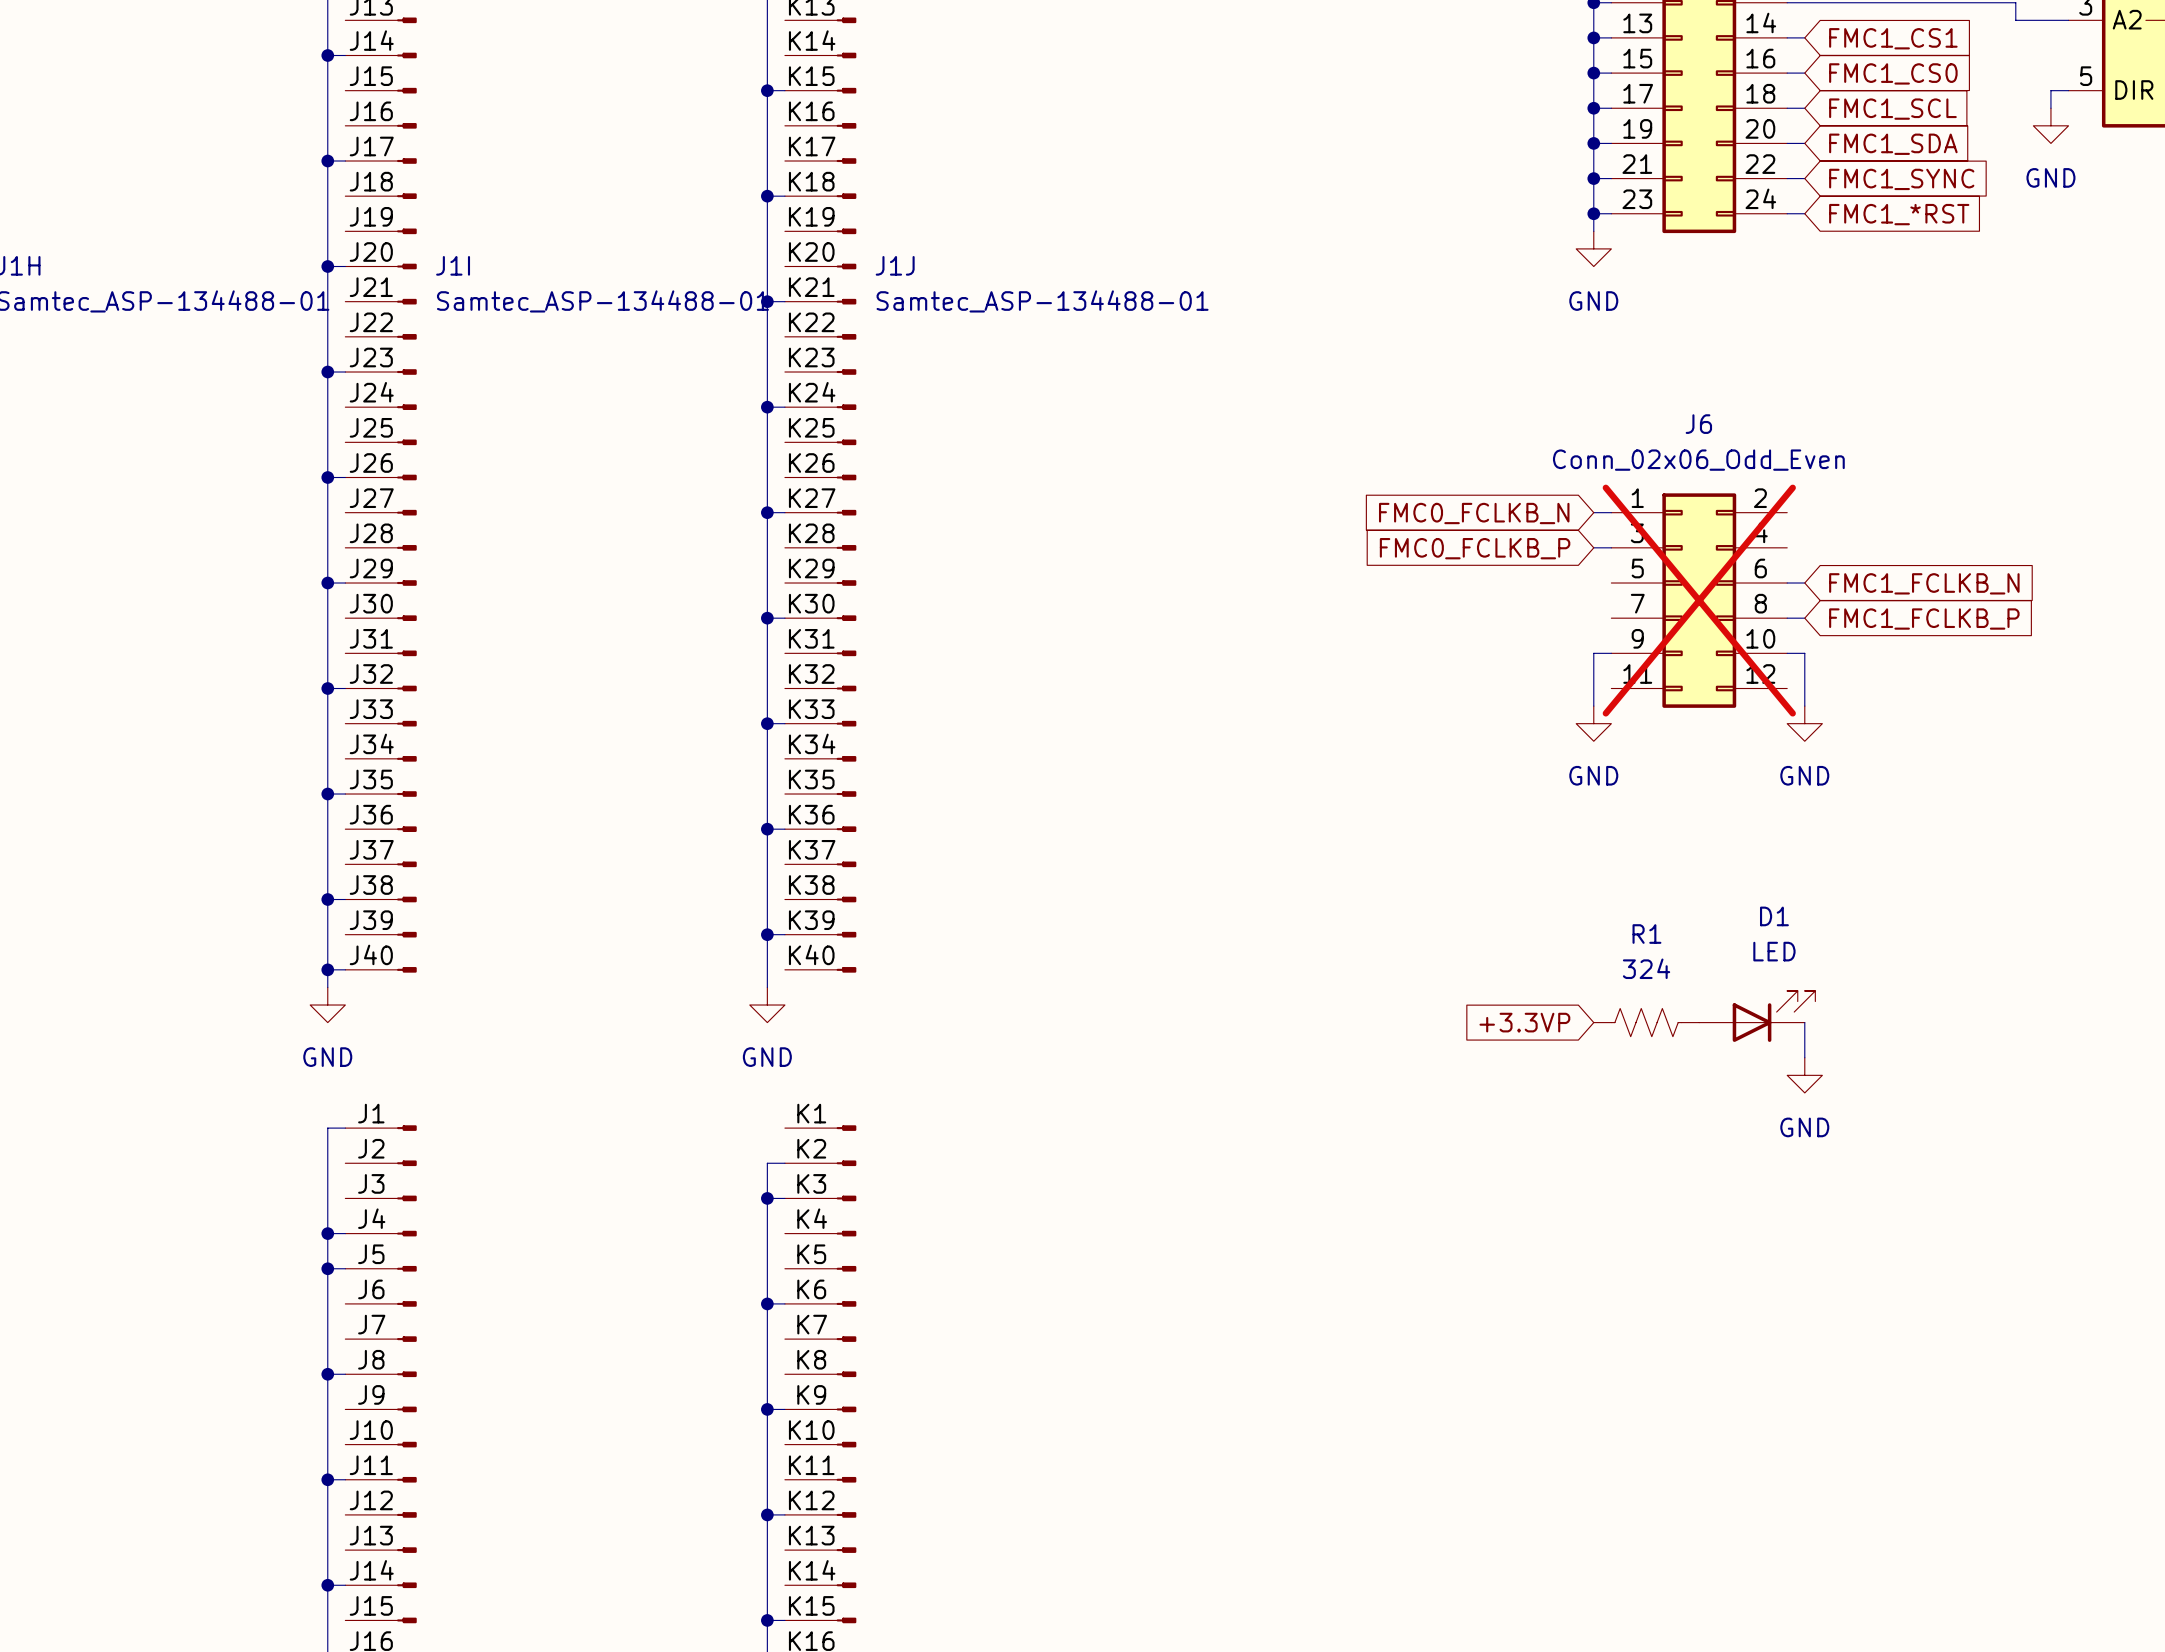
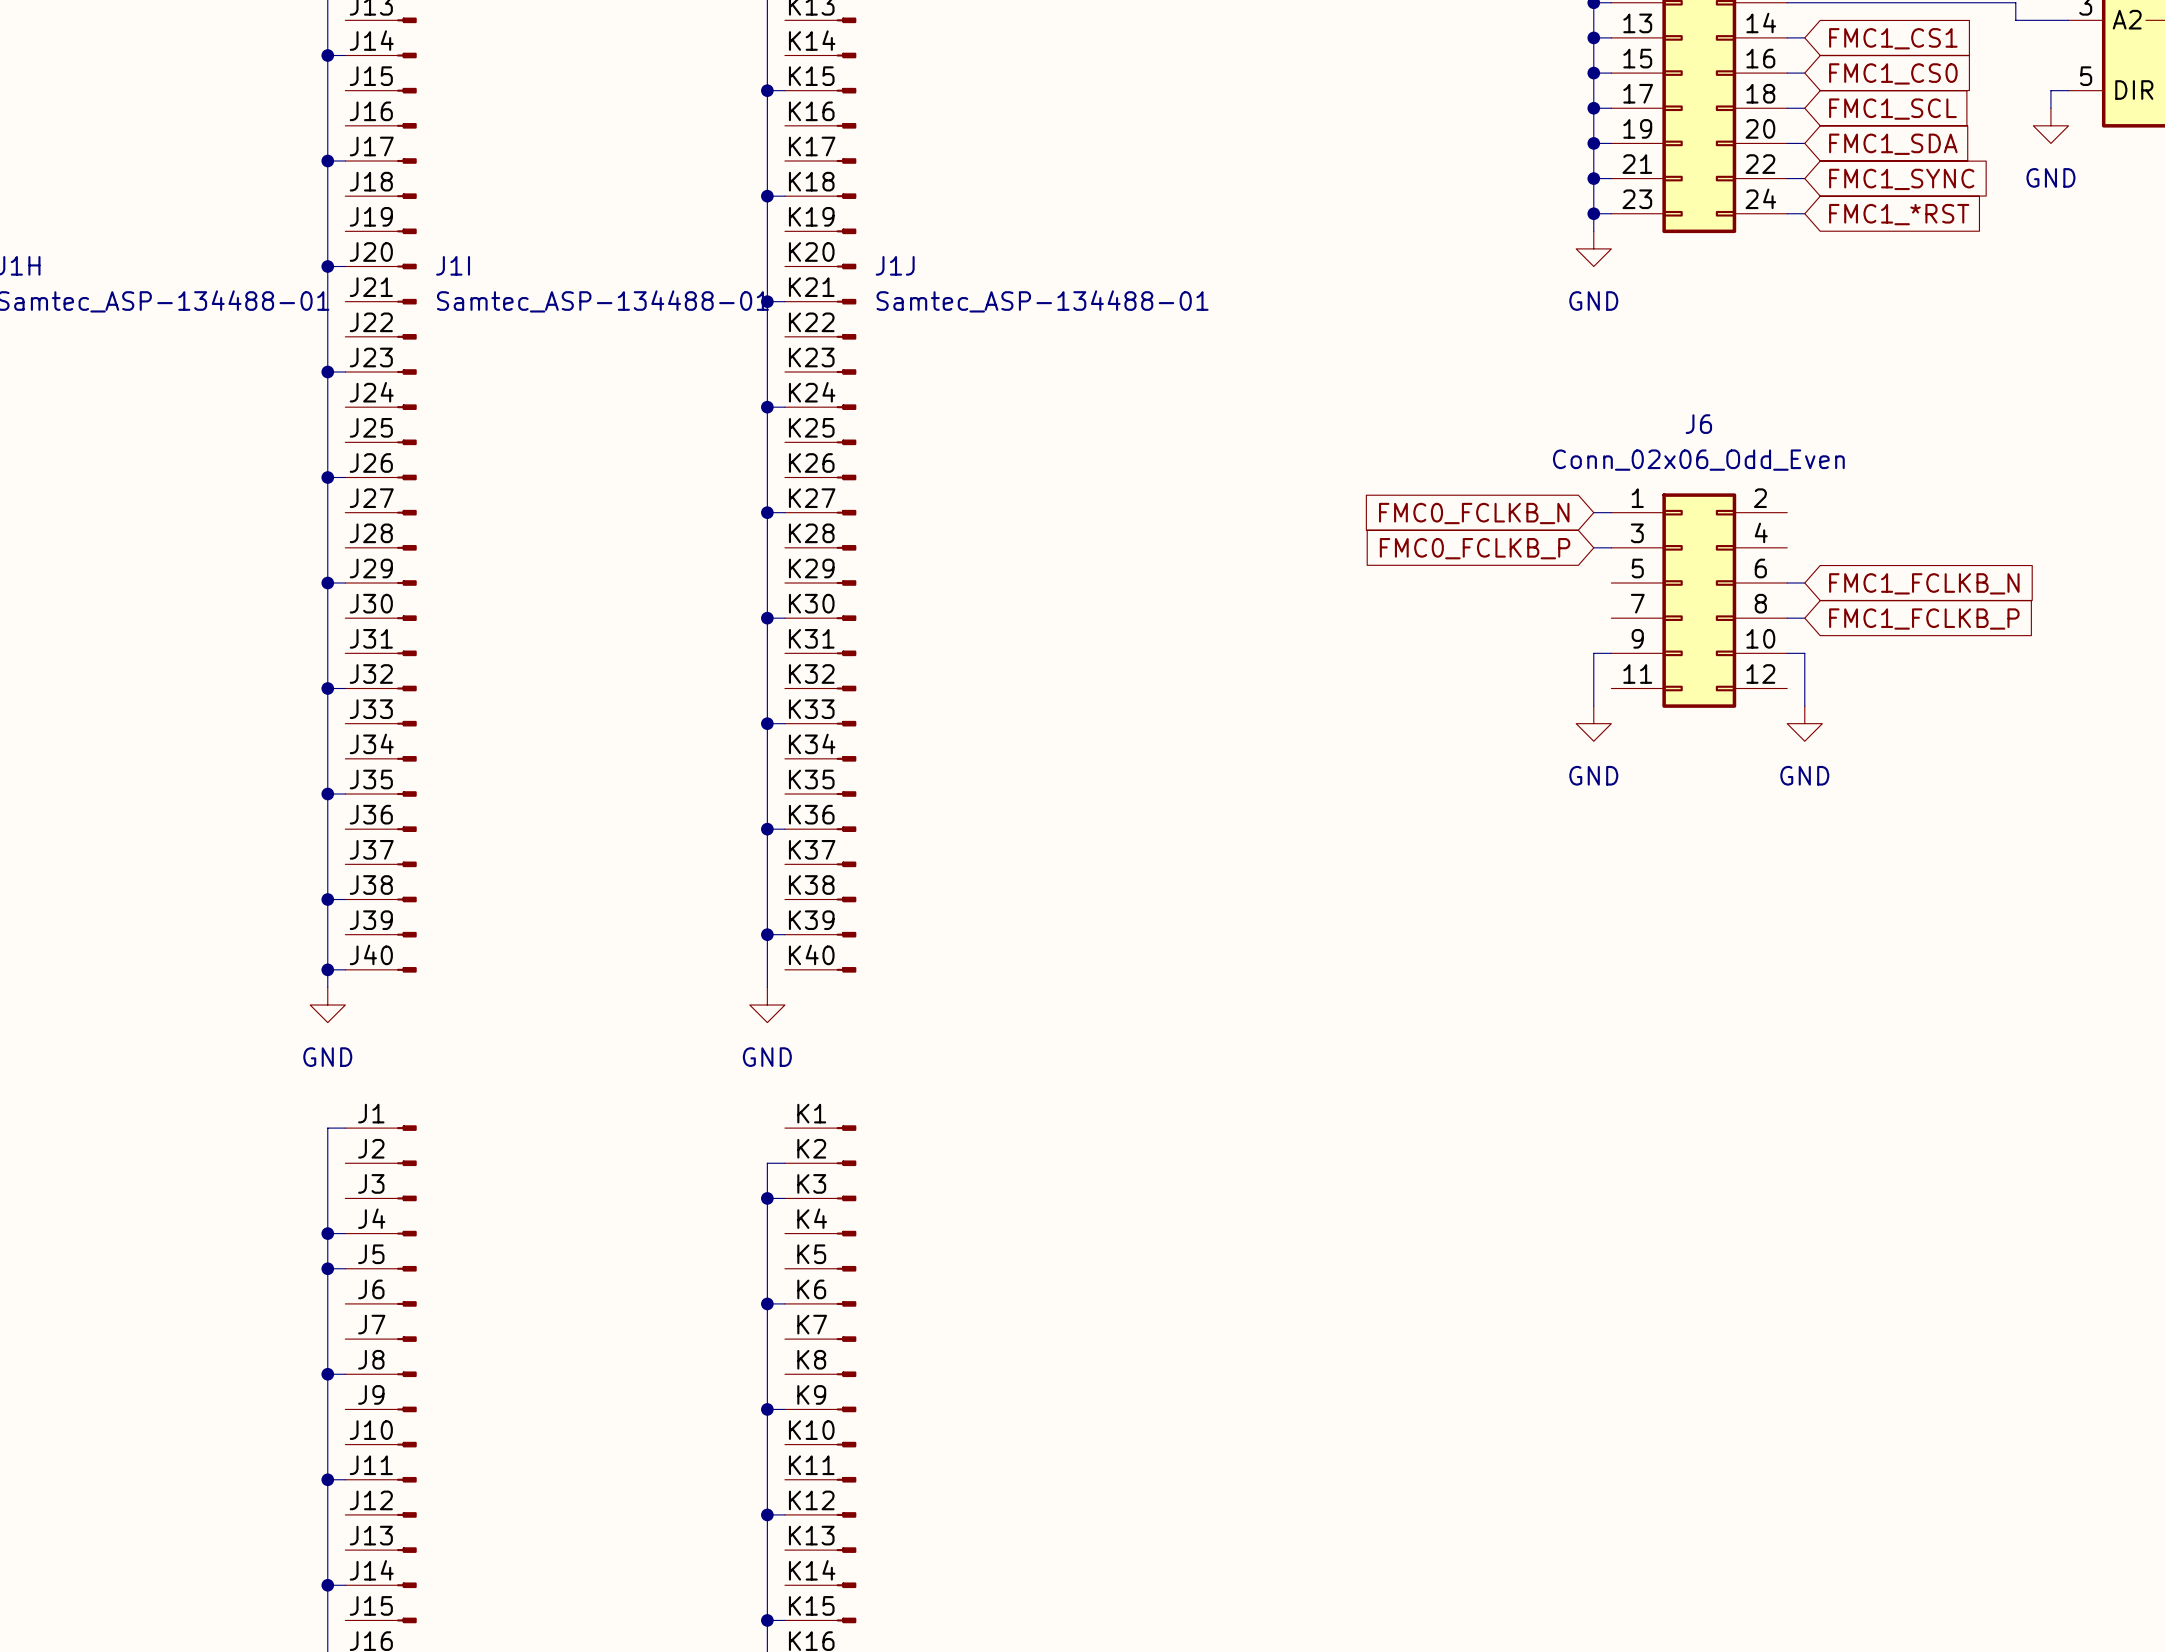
J6 do-not-place cross: (1699, 600) -> none
D1: LED (1757, 1016) -> none
global label: +3.3VP (1524, 1022) -> none
R1: 324 (1646, 1022) -> none
wire: (1804, 1022) (1804, 1057) -> none
power symbol: GND (1804, 1075) -> none

